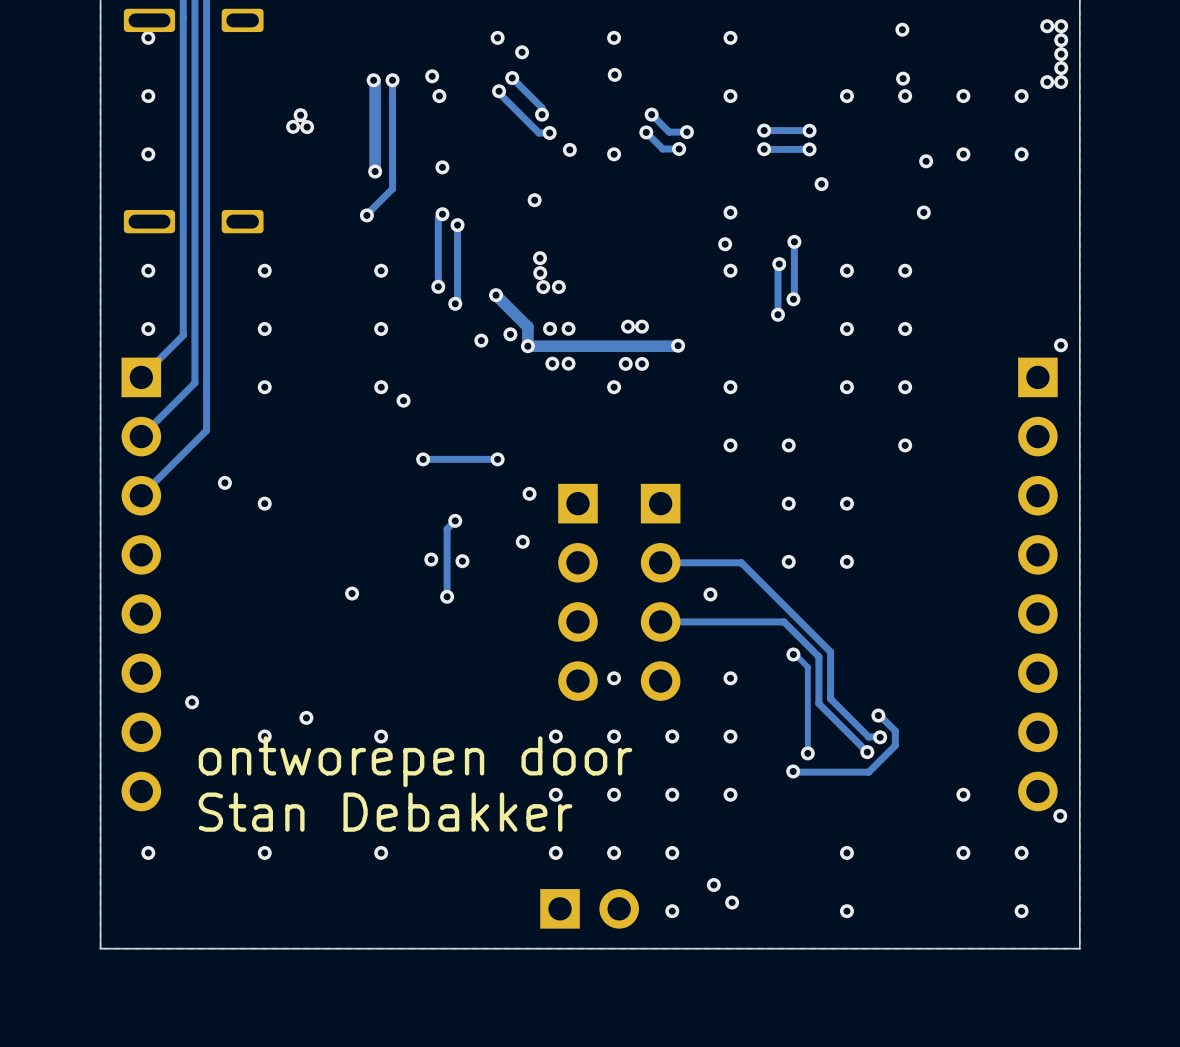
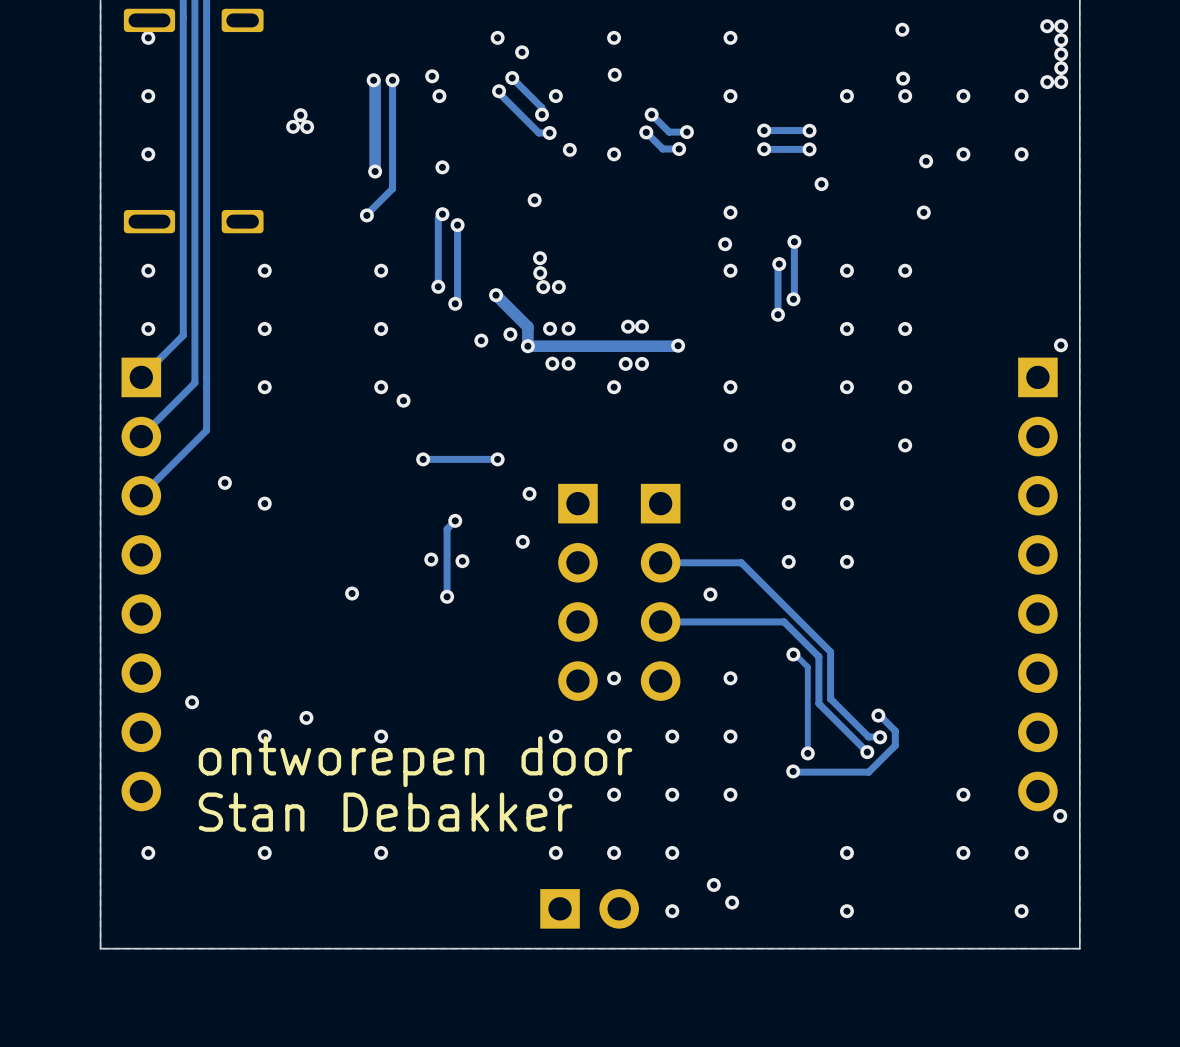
via: none -> (555, 96)

